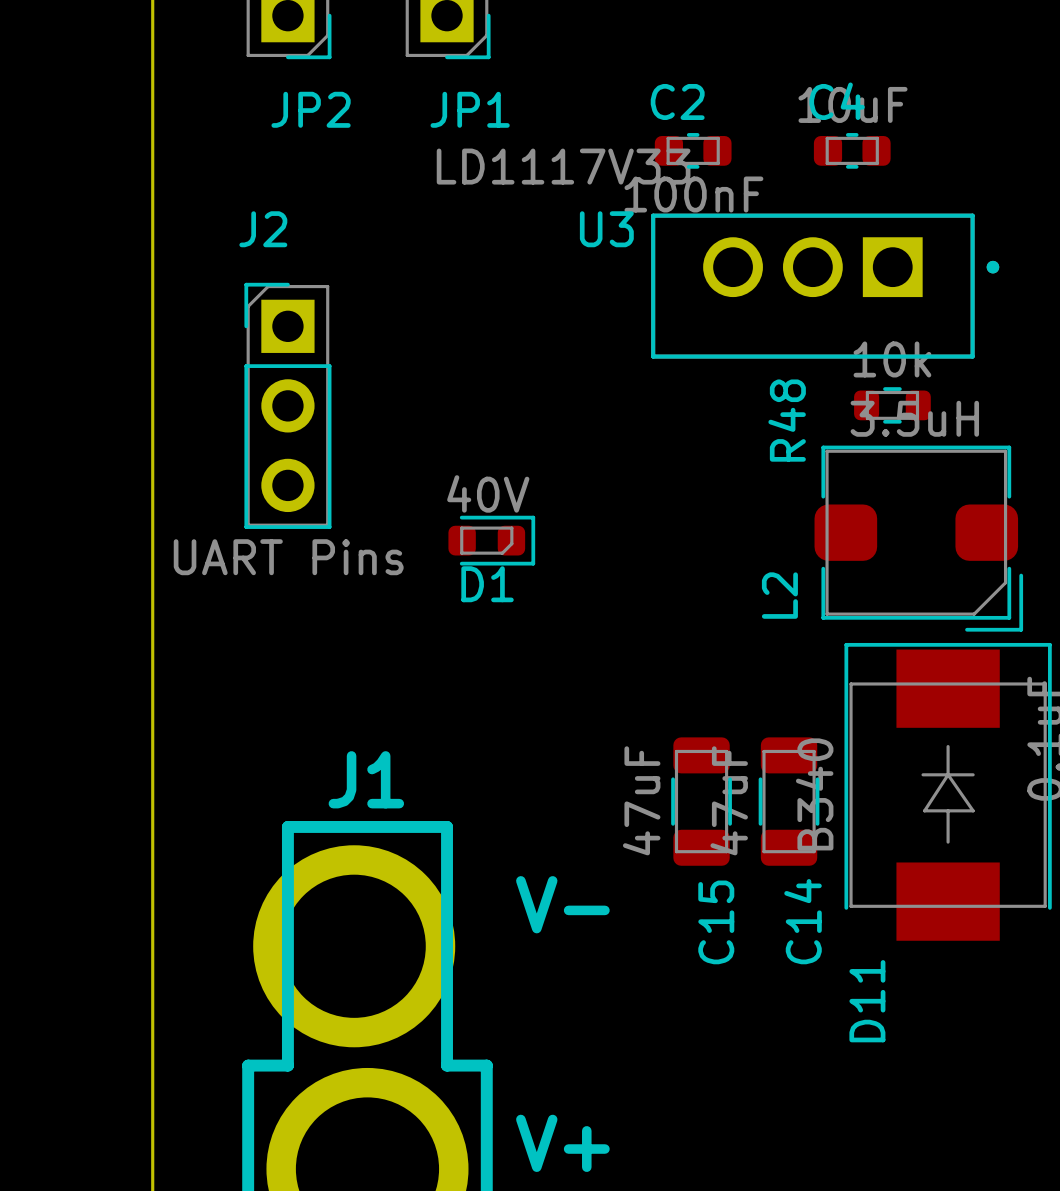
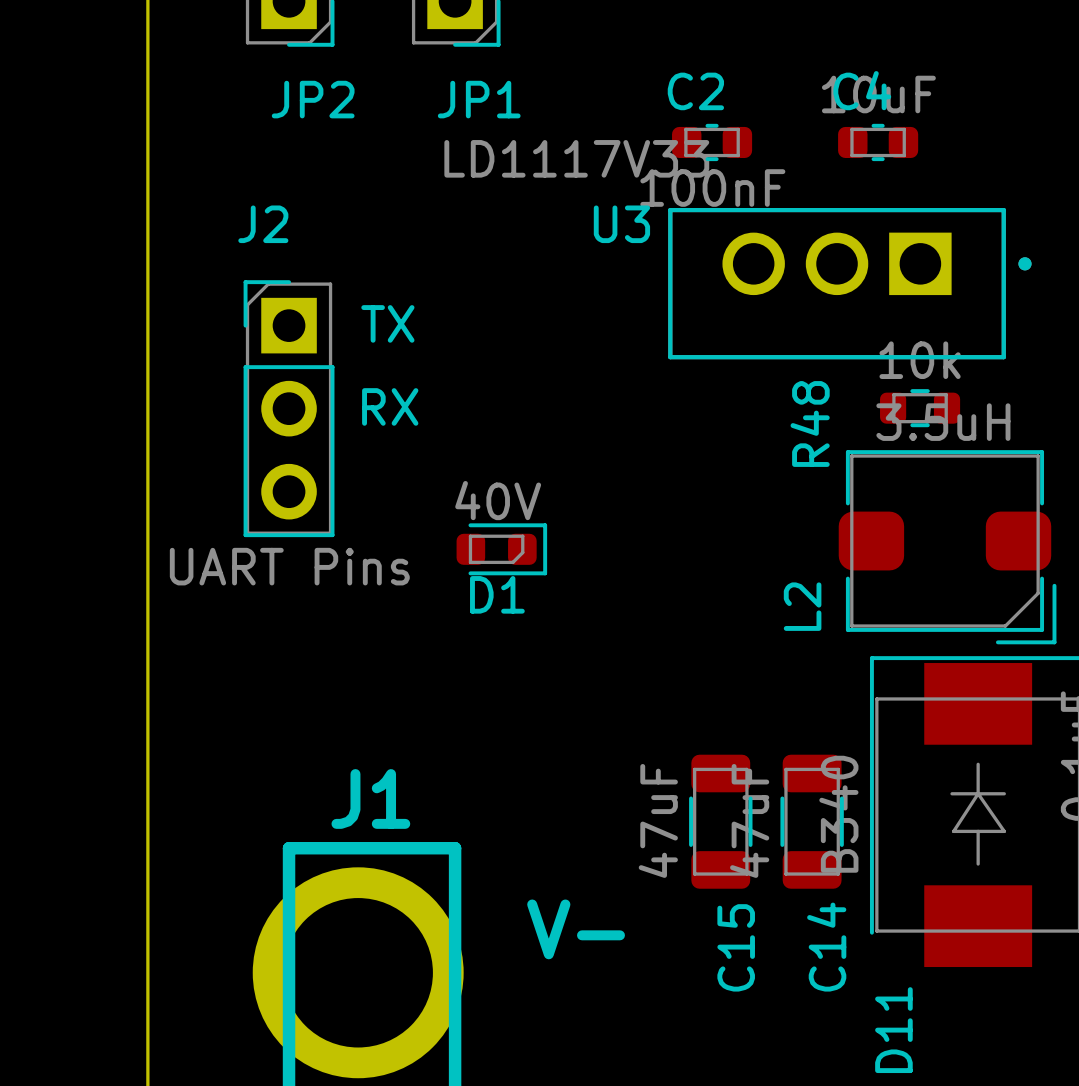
text: none -> TX (387, 323)
text: none -> RX (390, 406)

